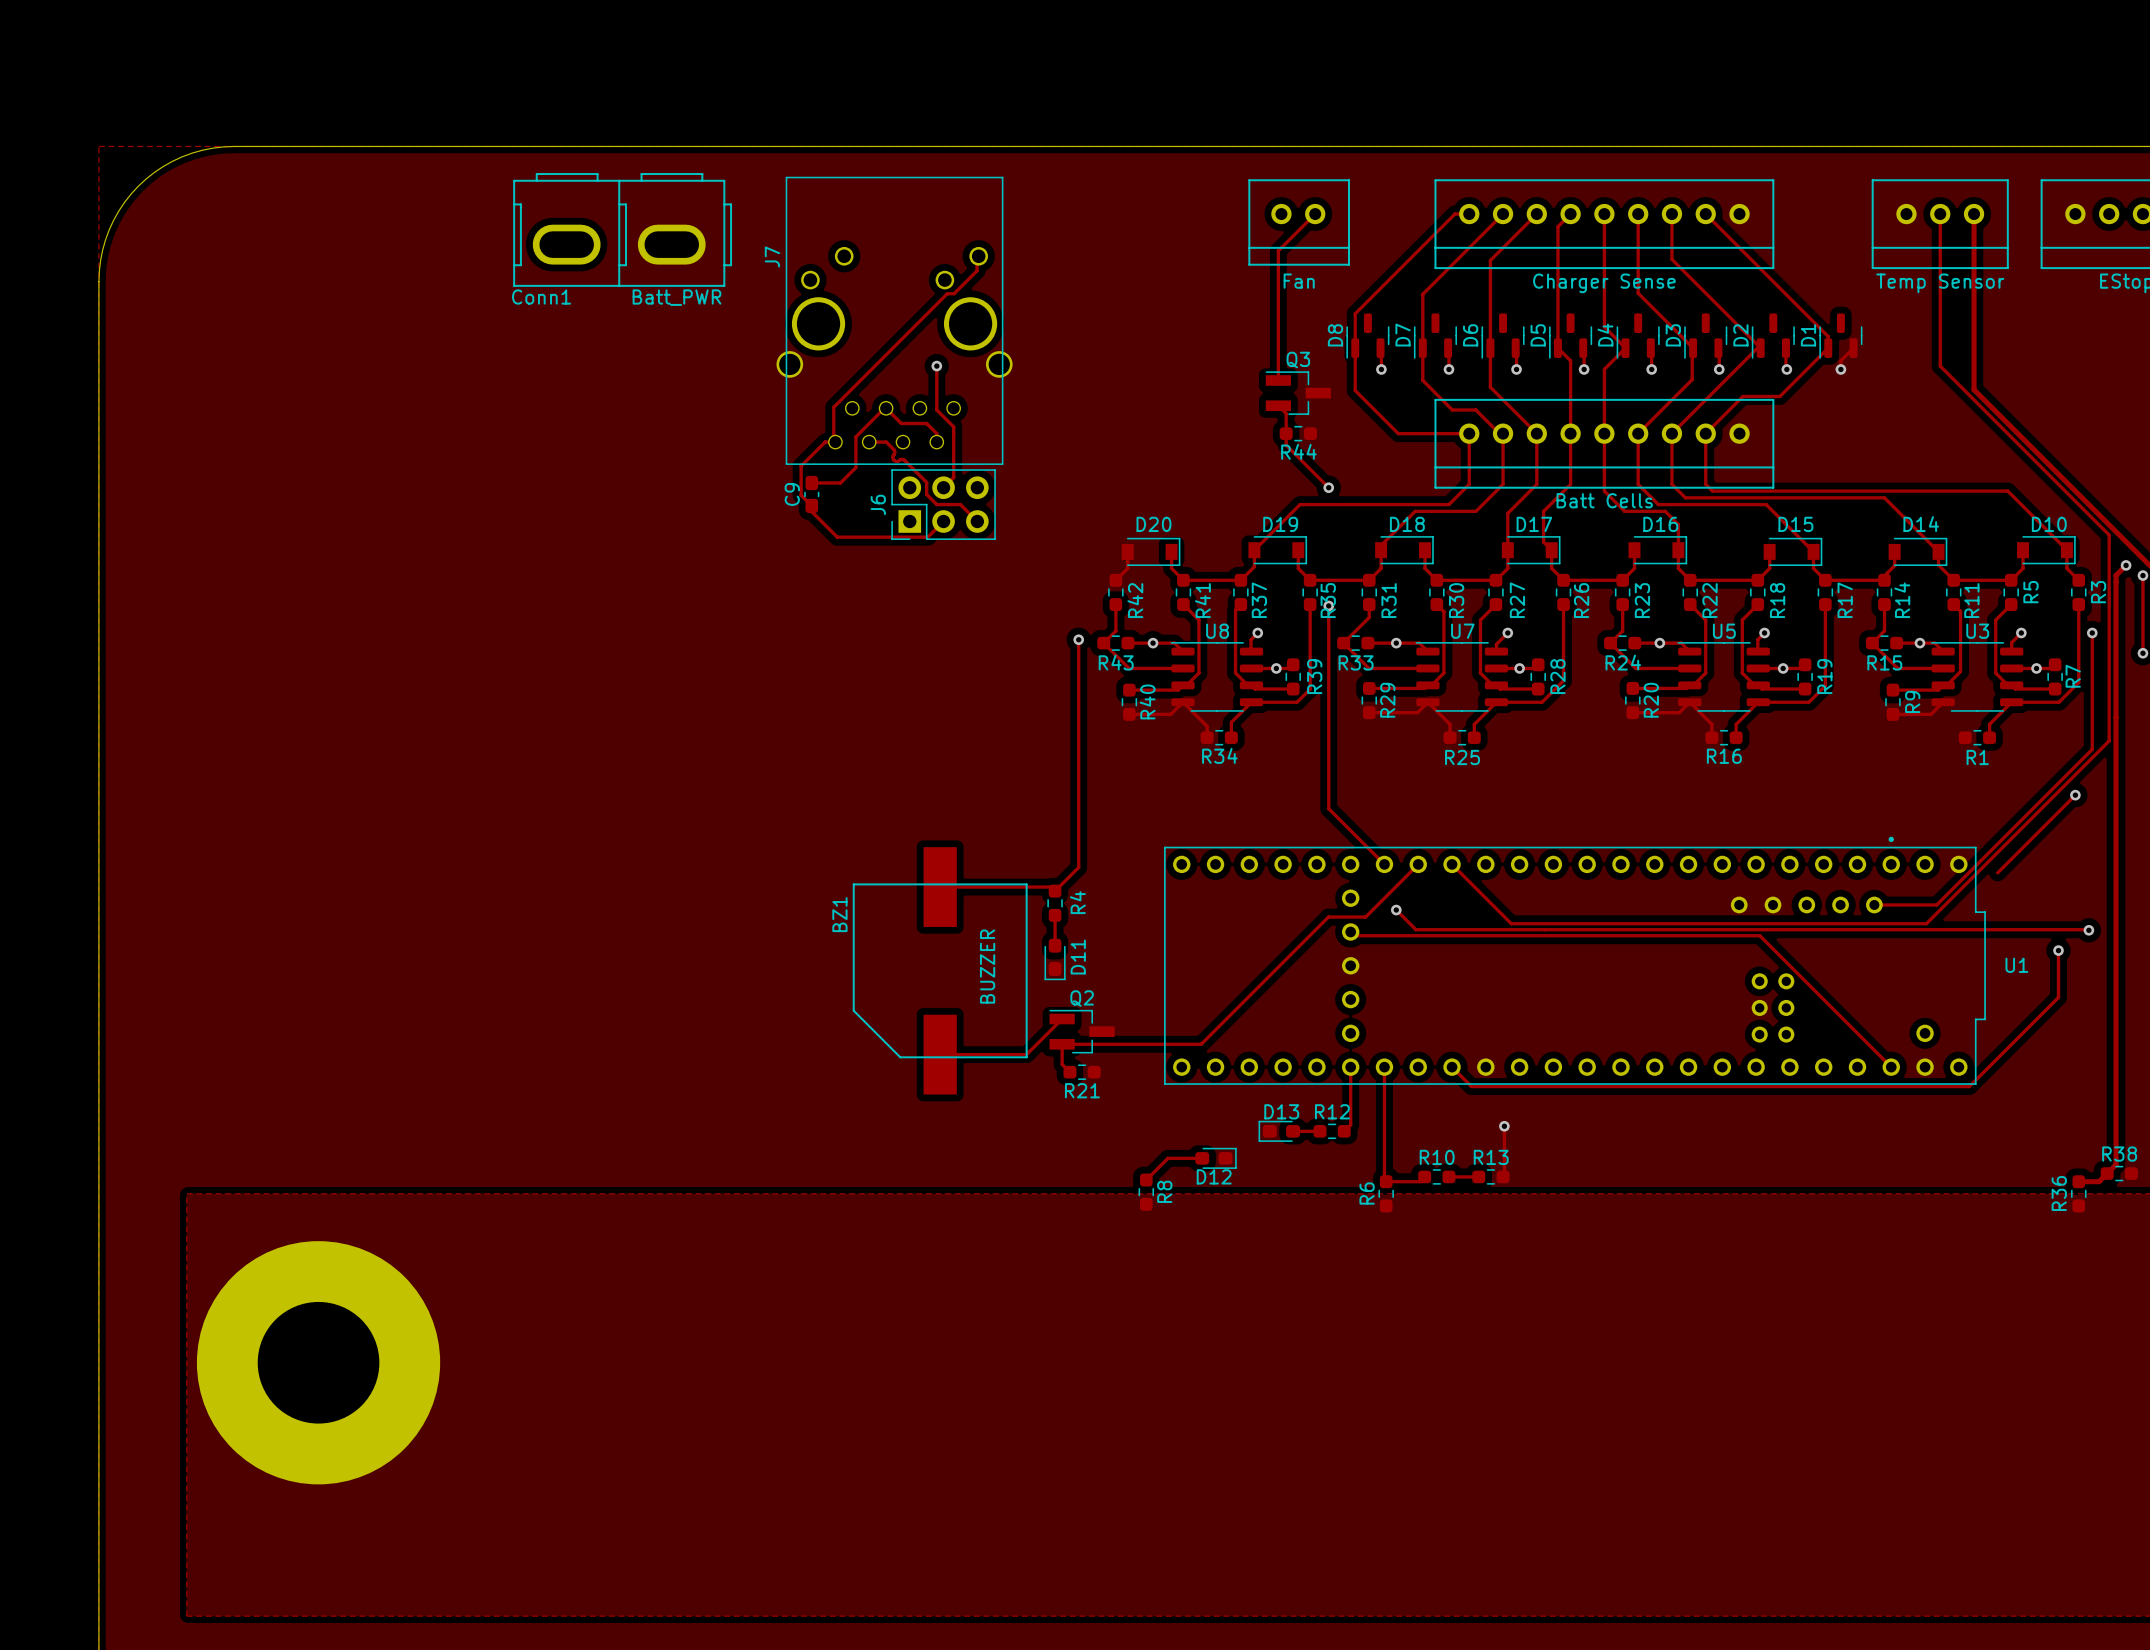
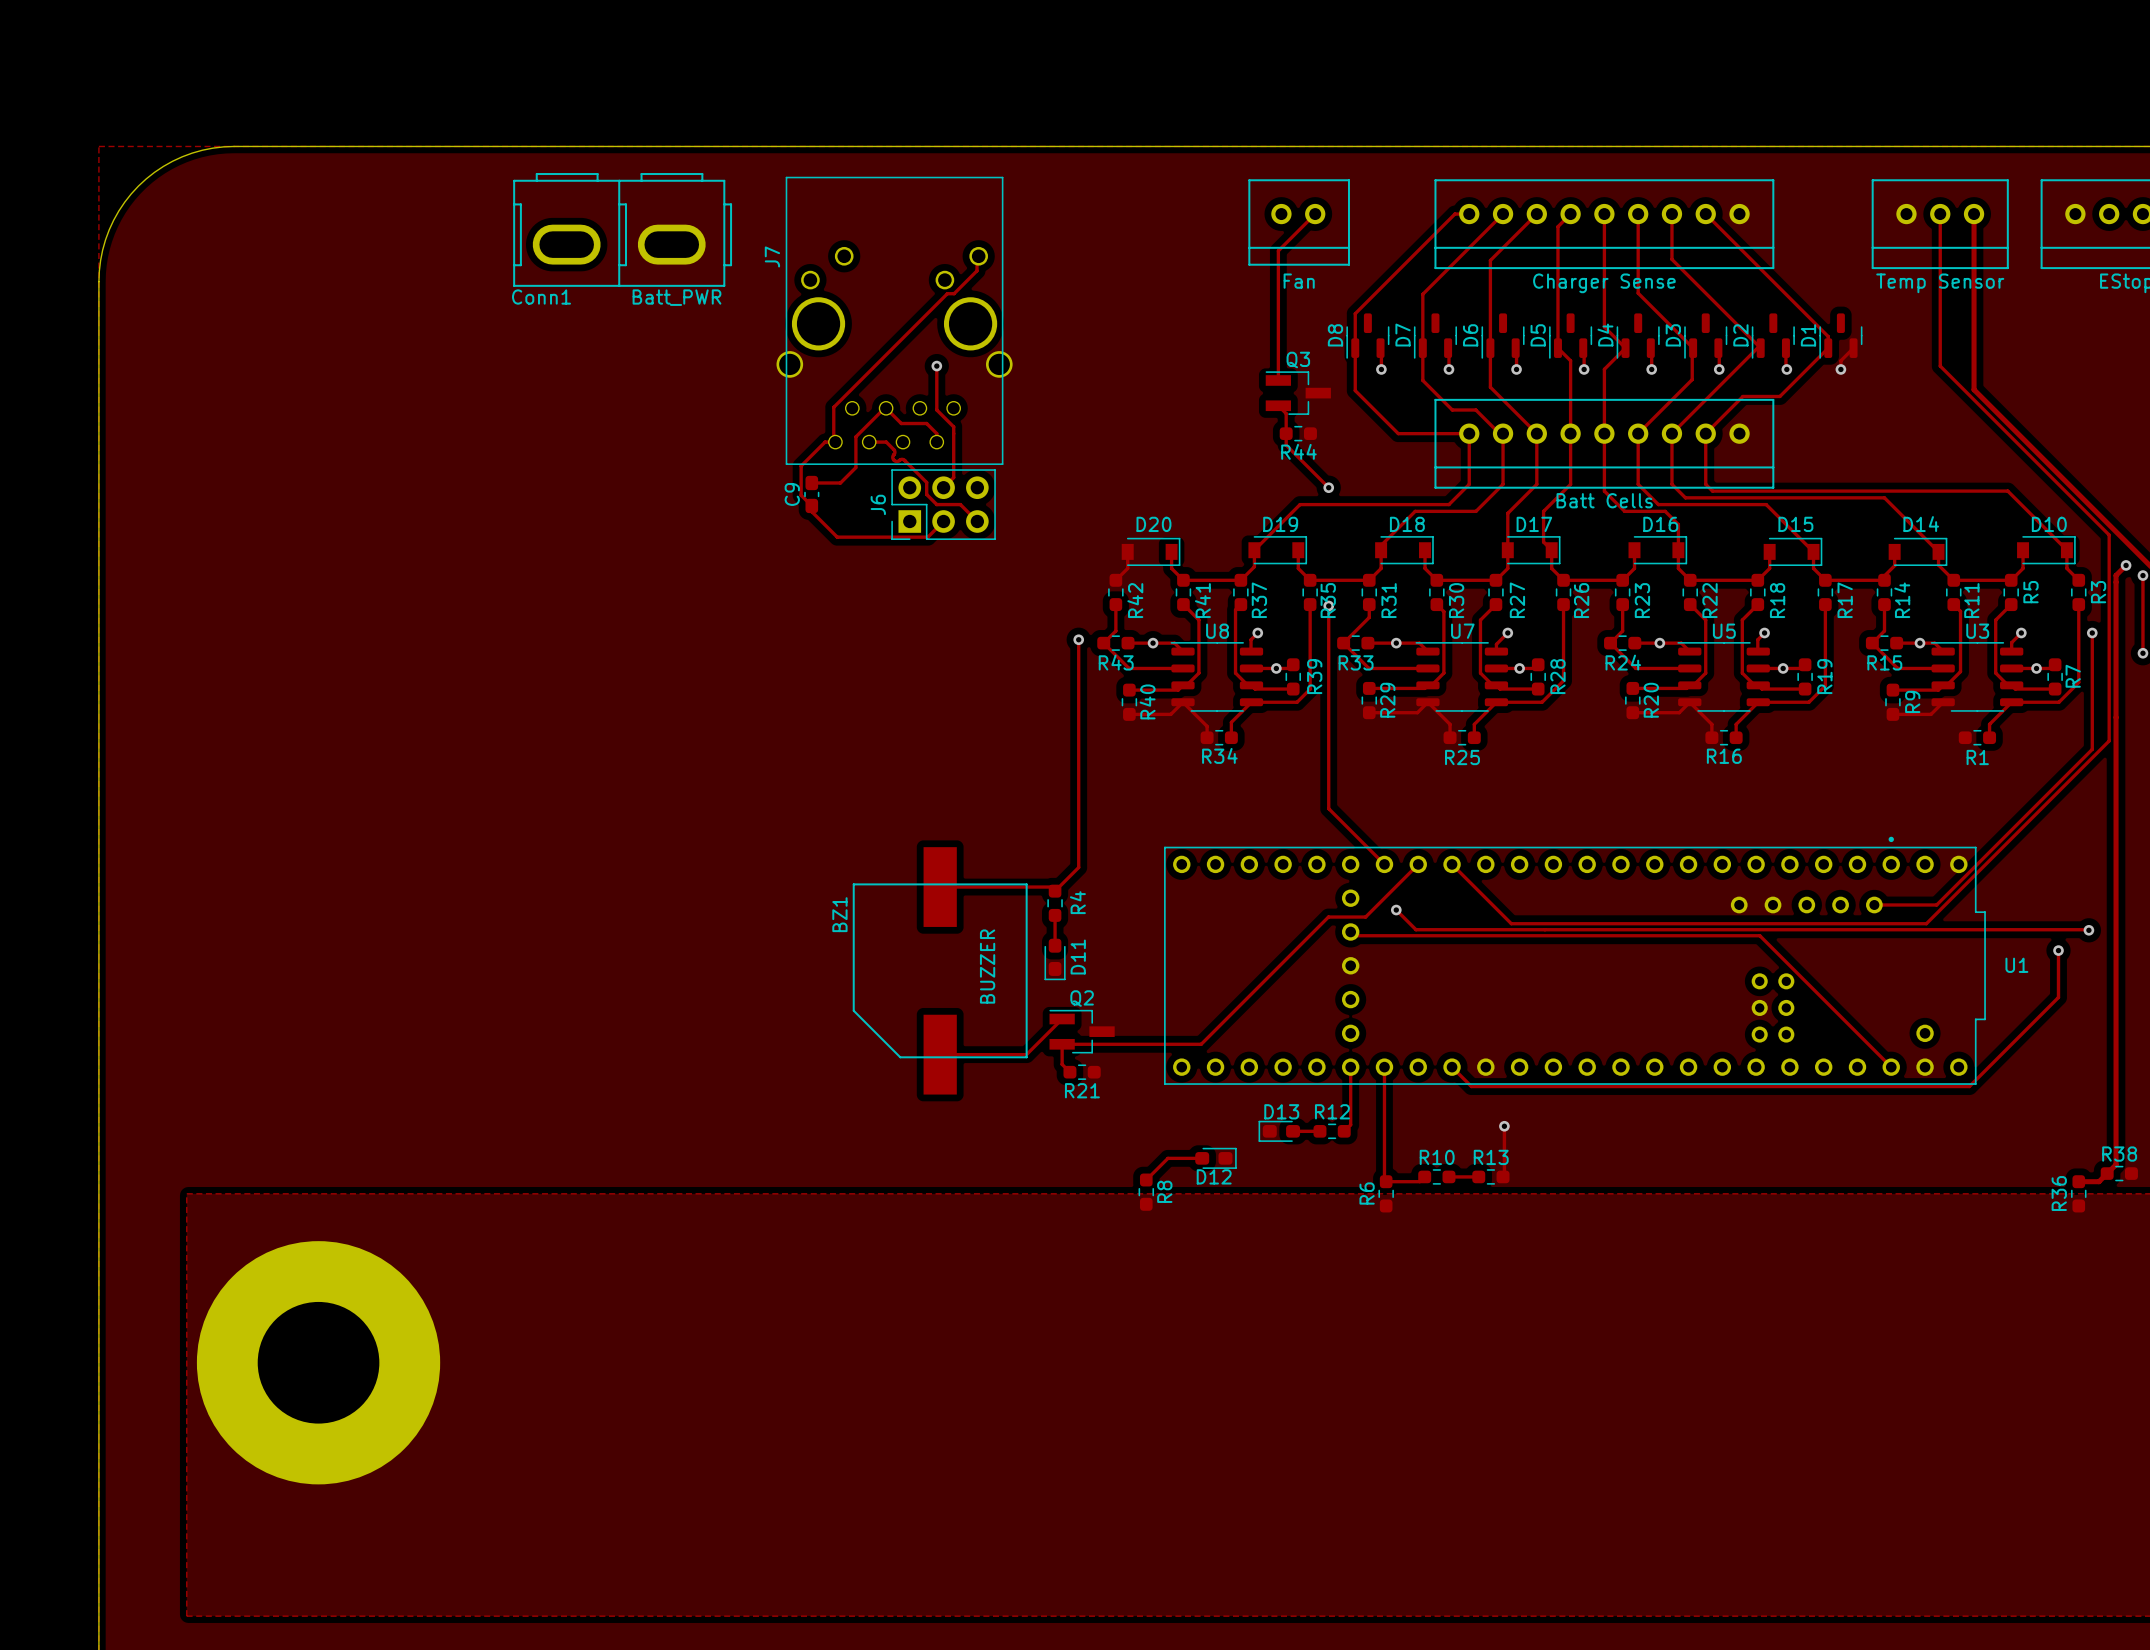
track: (2075, 795) (1997, 872) -> none
via: (2075, 795) -> none

